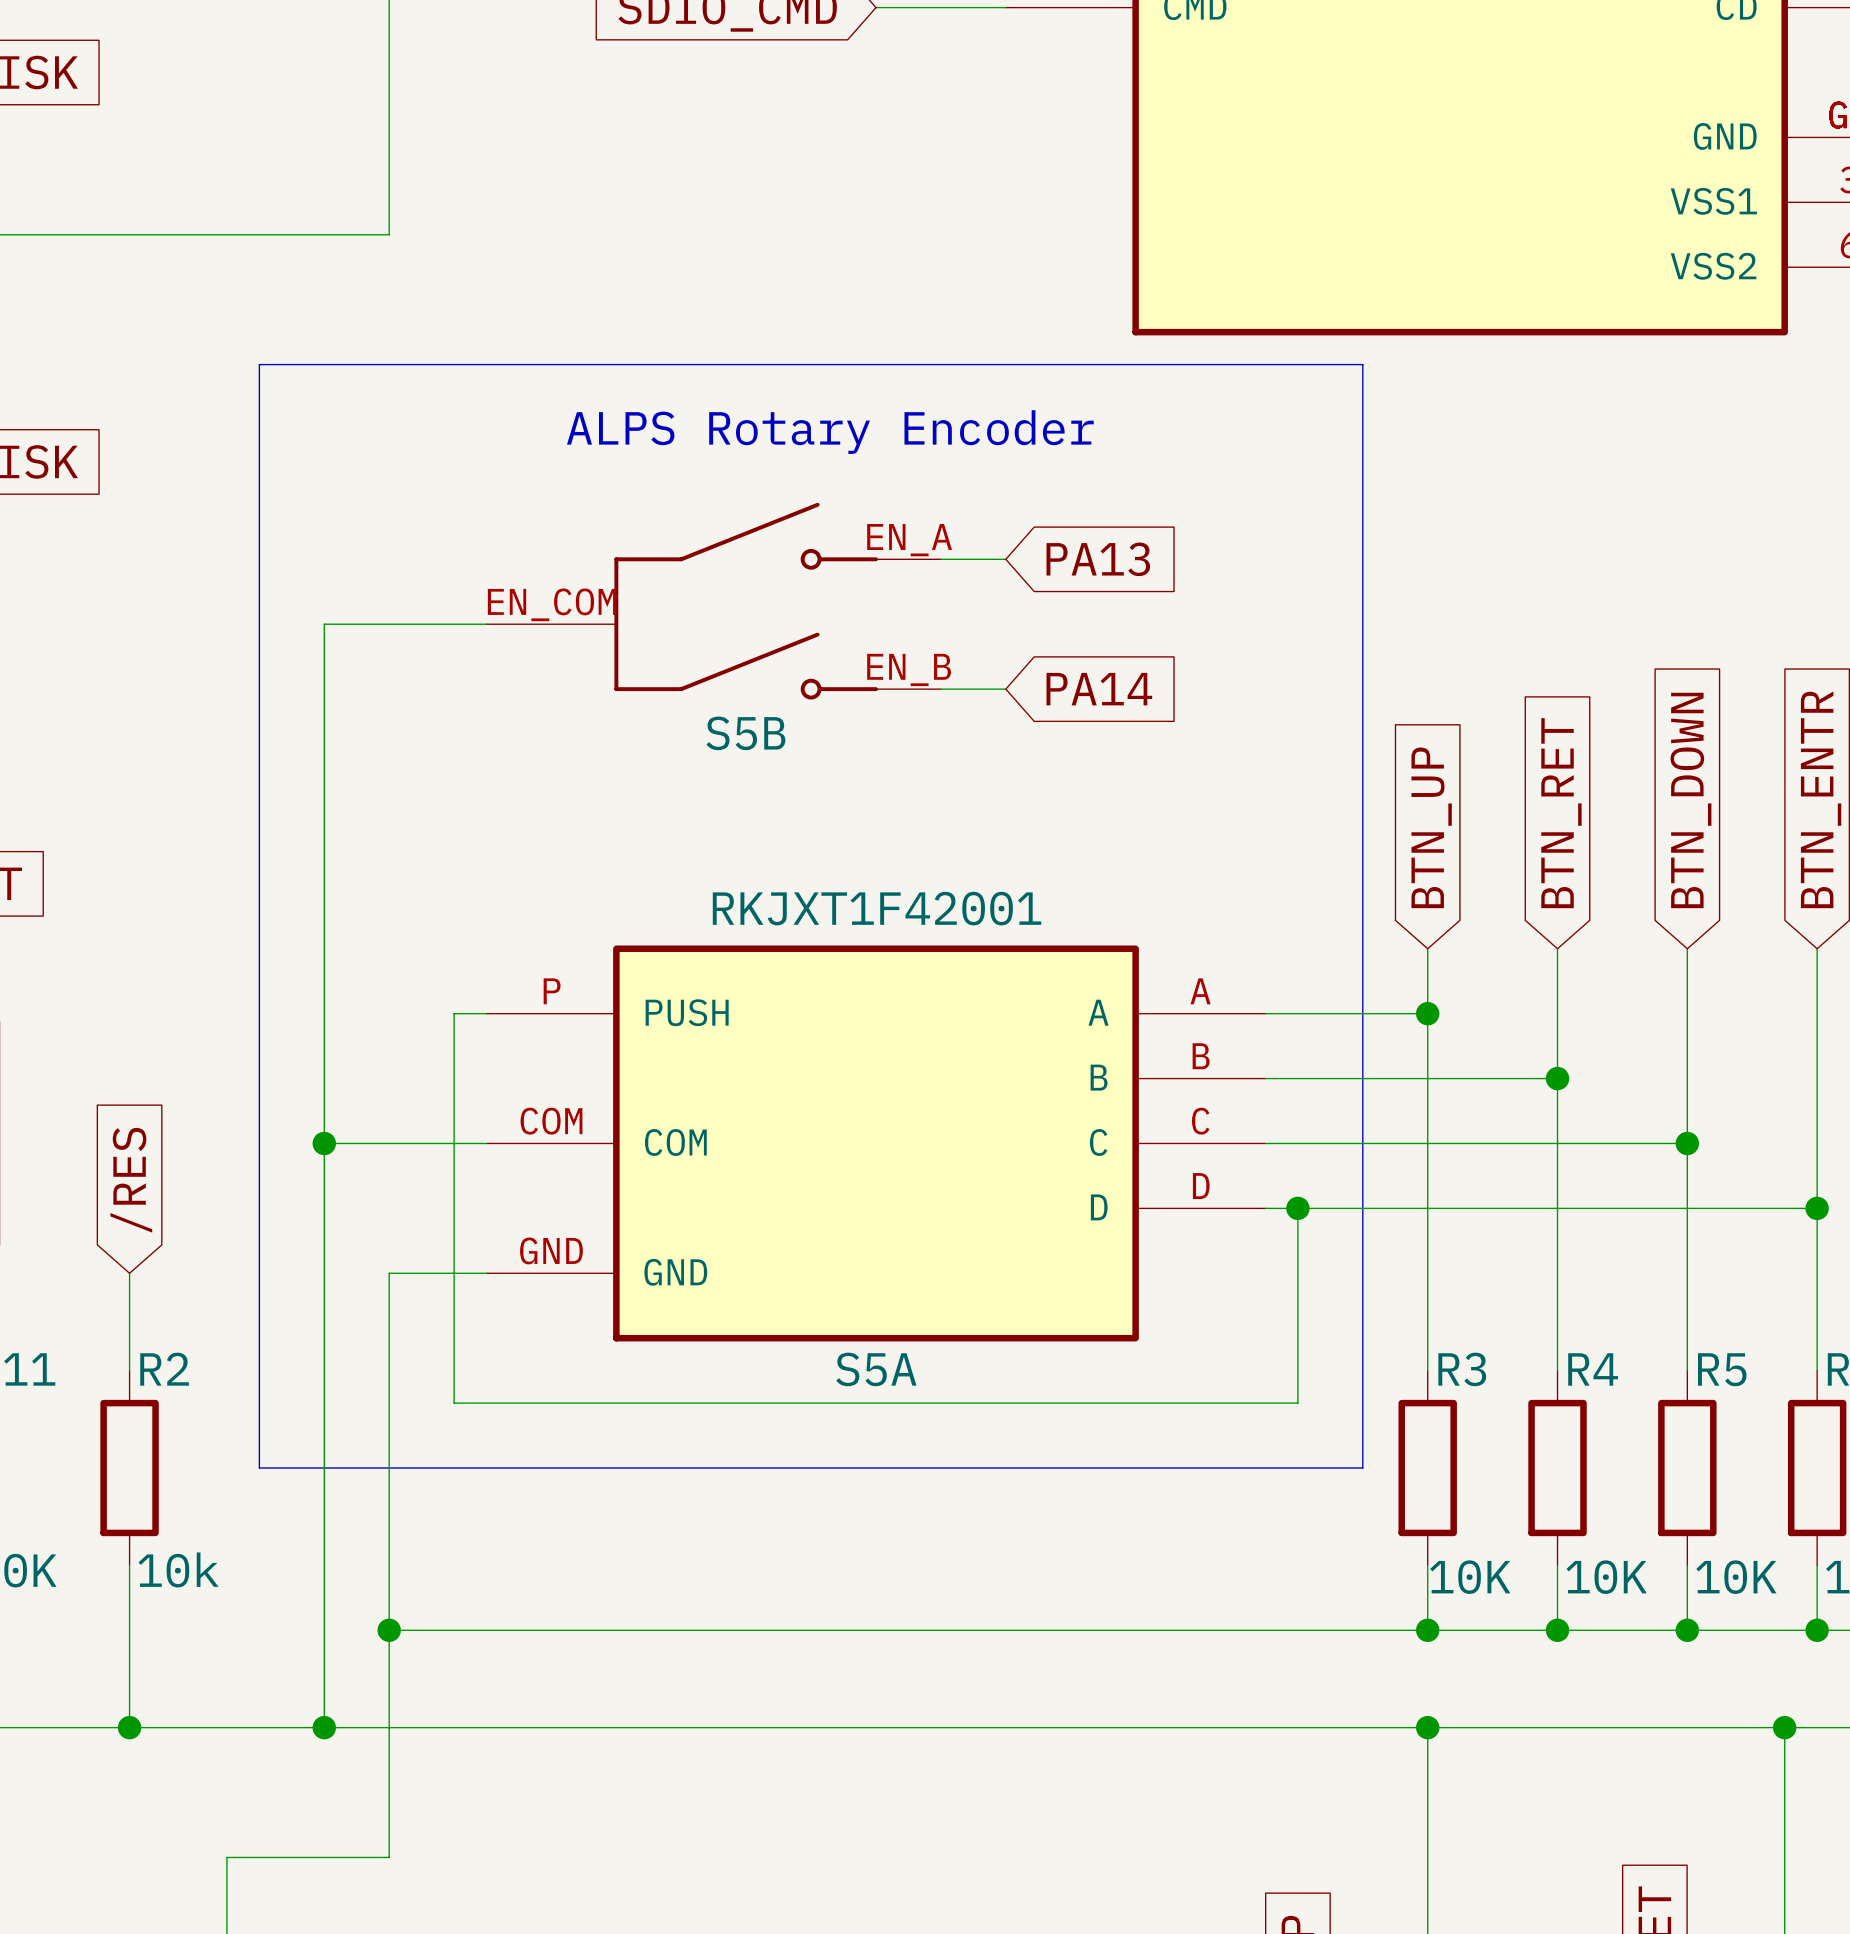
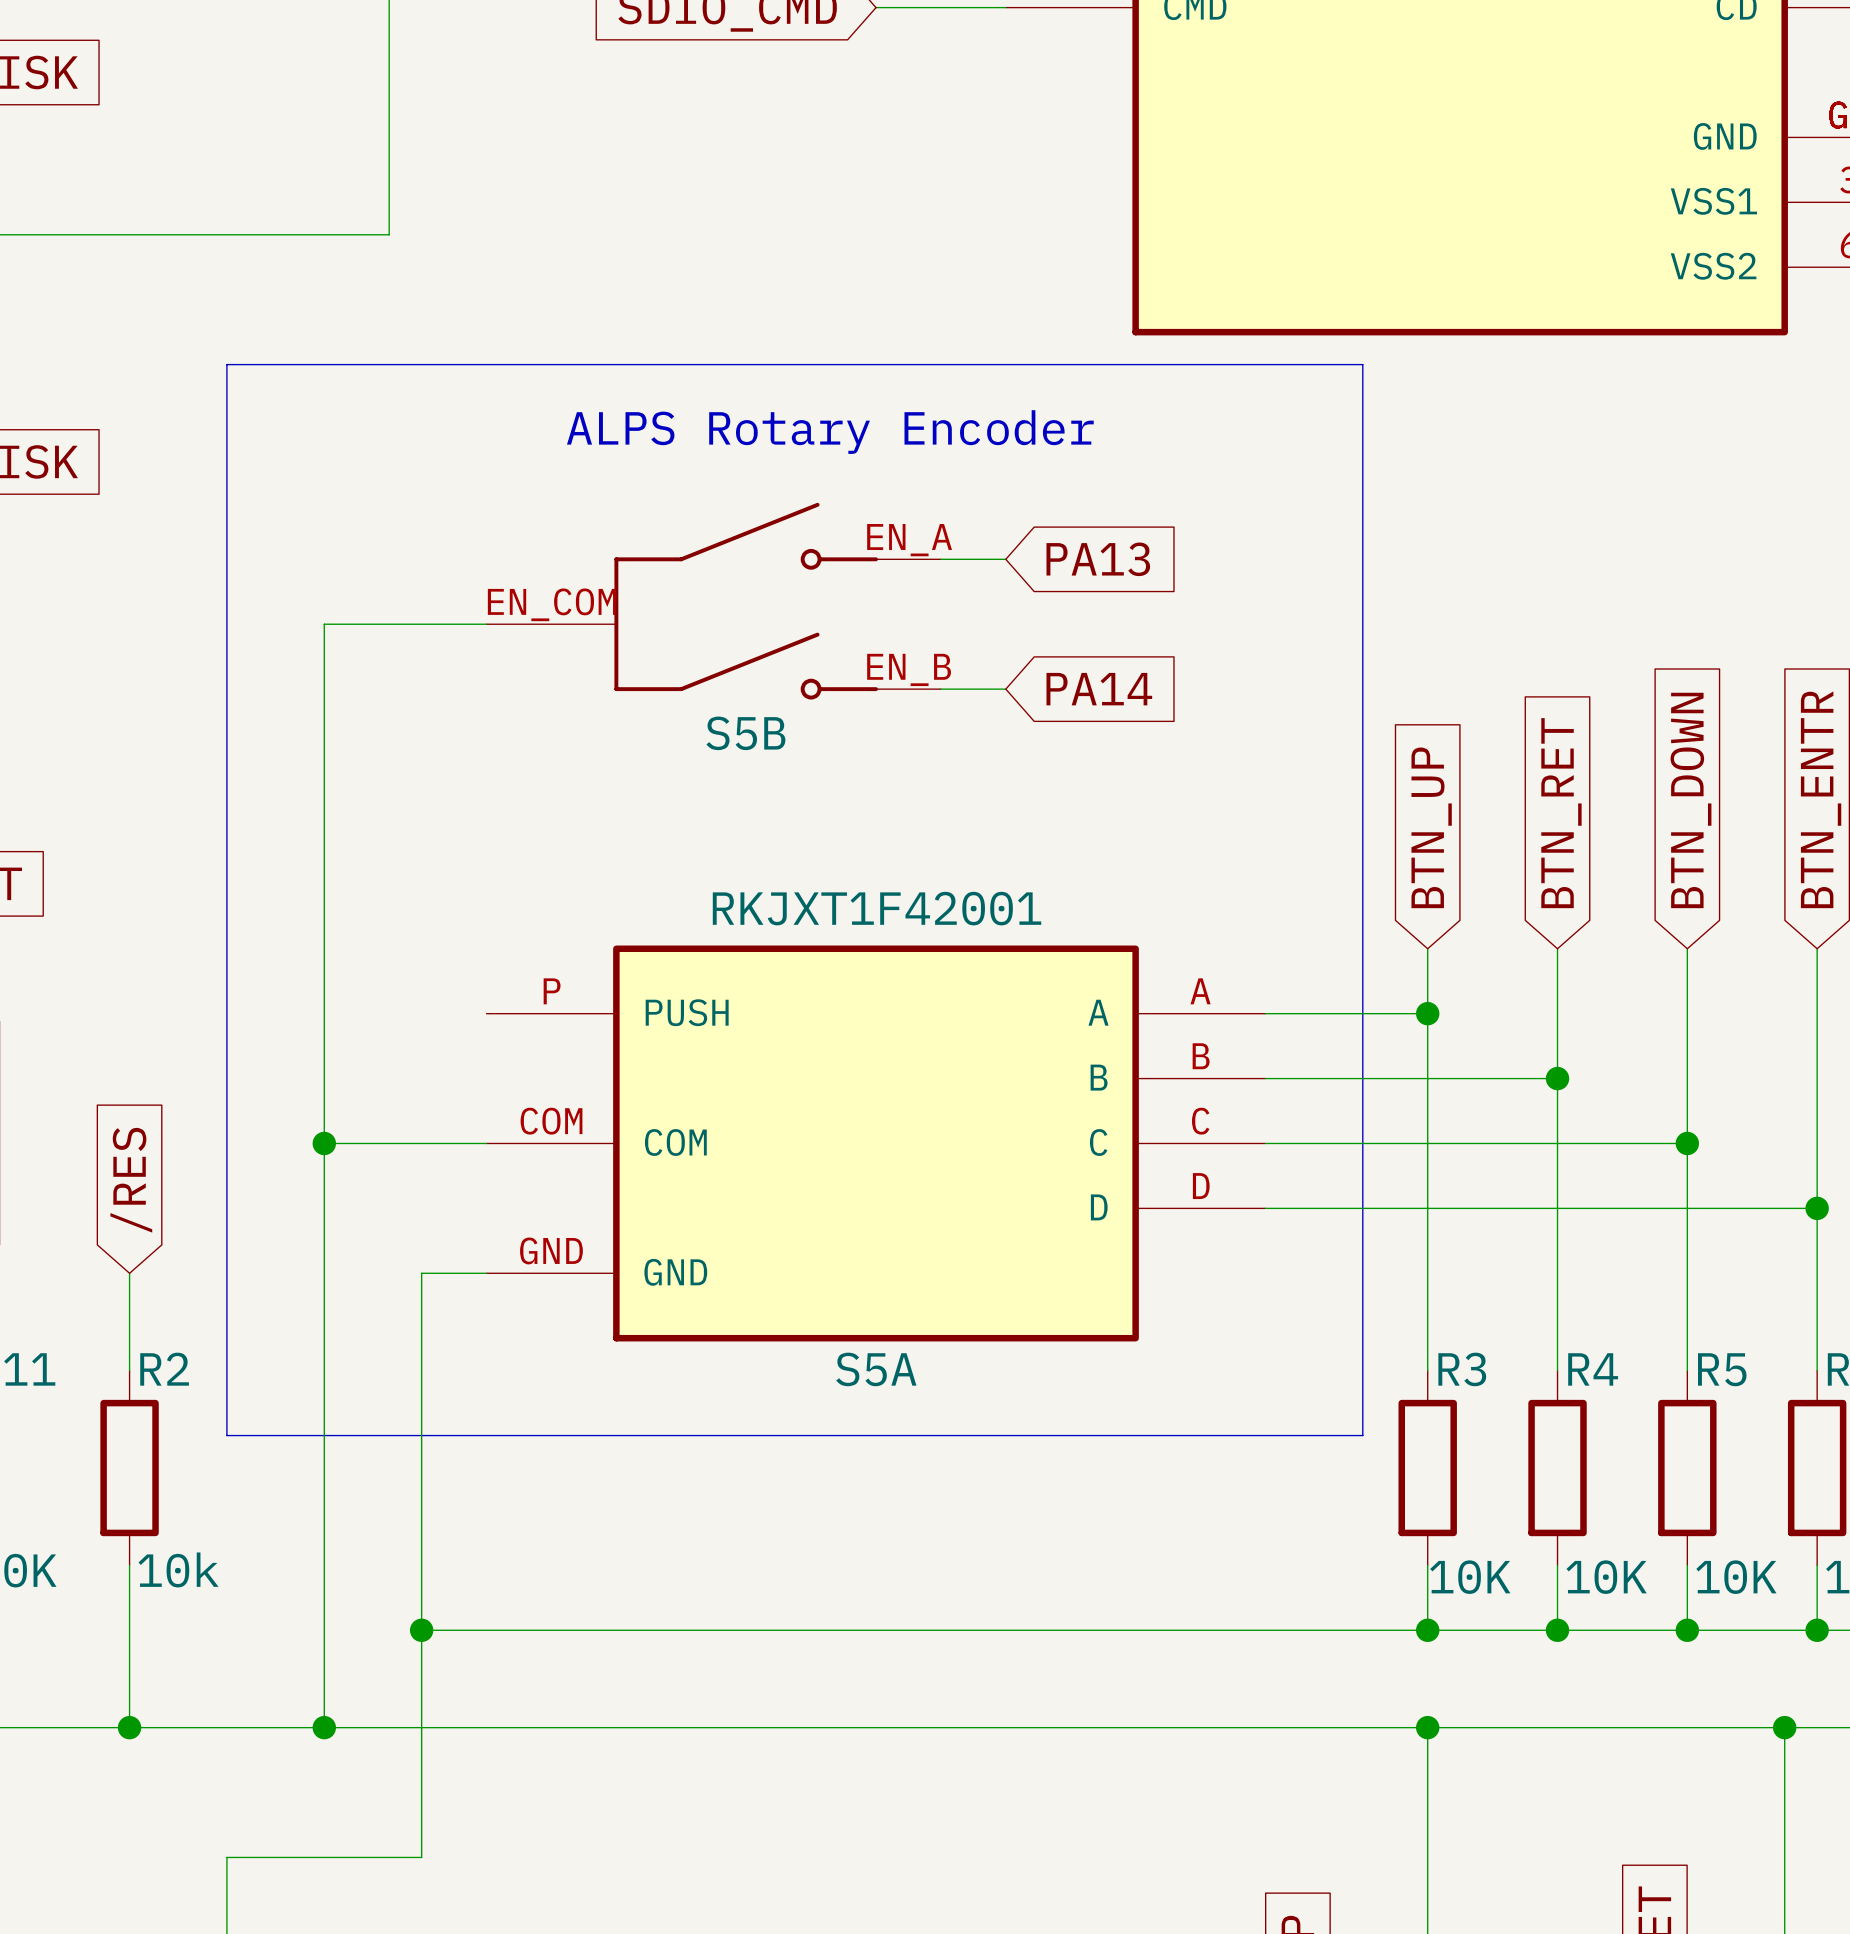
line: (259, 364) (259, 1468) (1362, 1468) (1362, 1435) -> (259, 364) (226, 364) (226, 1435) (1362, 1435)
wire: (486, 1013) (454, 1013) (454, 1403) (1297, 1403) (1297, 1208) -> none
junction: (1297, 1208) -> none
wire: (421, 1273) (389, 1273) (389, 1857) -> (421, 1273) (421, 1857) (389, 1857)
wire: (389, 1630) (421, 1630) -> none
junction position: (389, 1630) -> (421, 1630)

